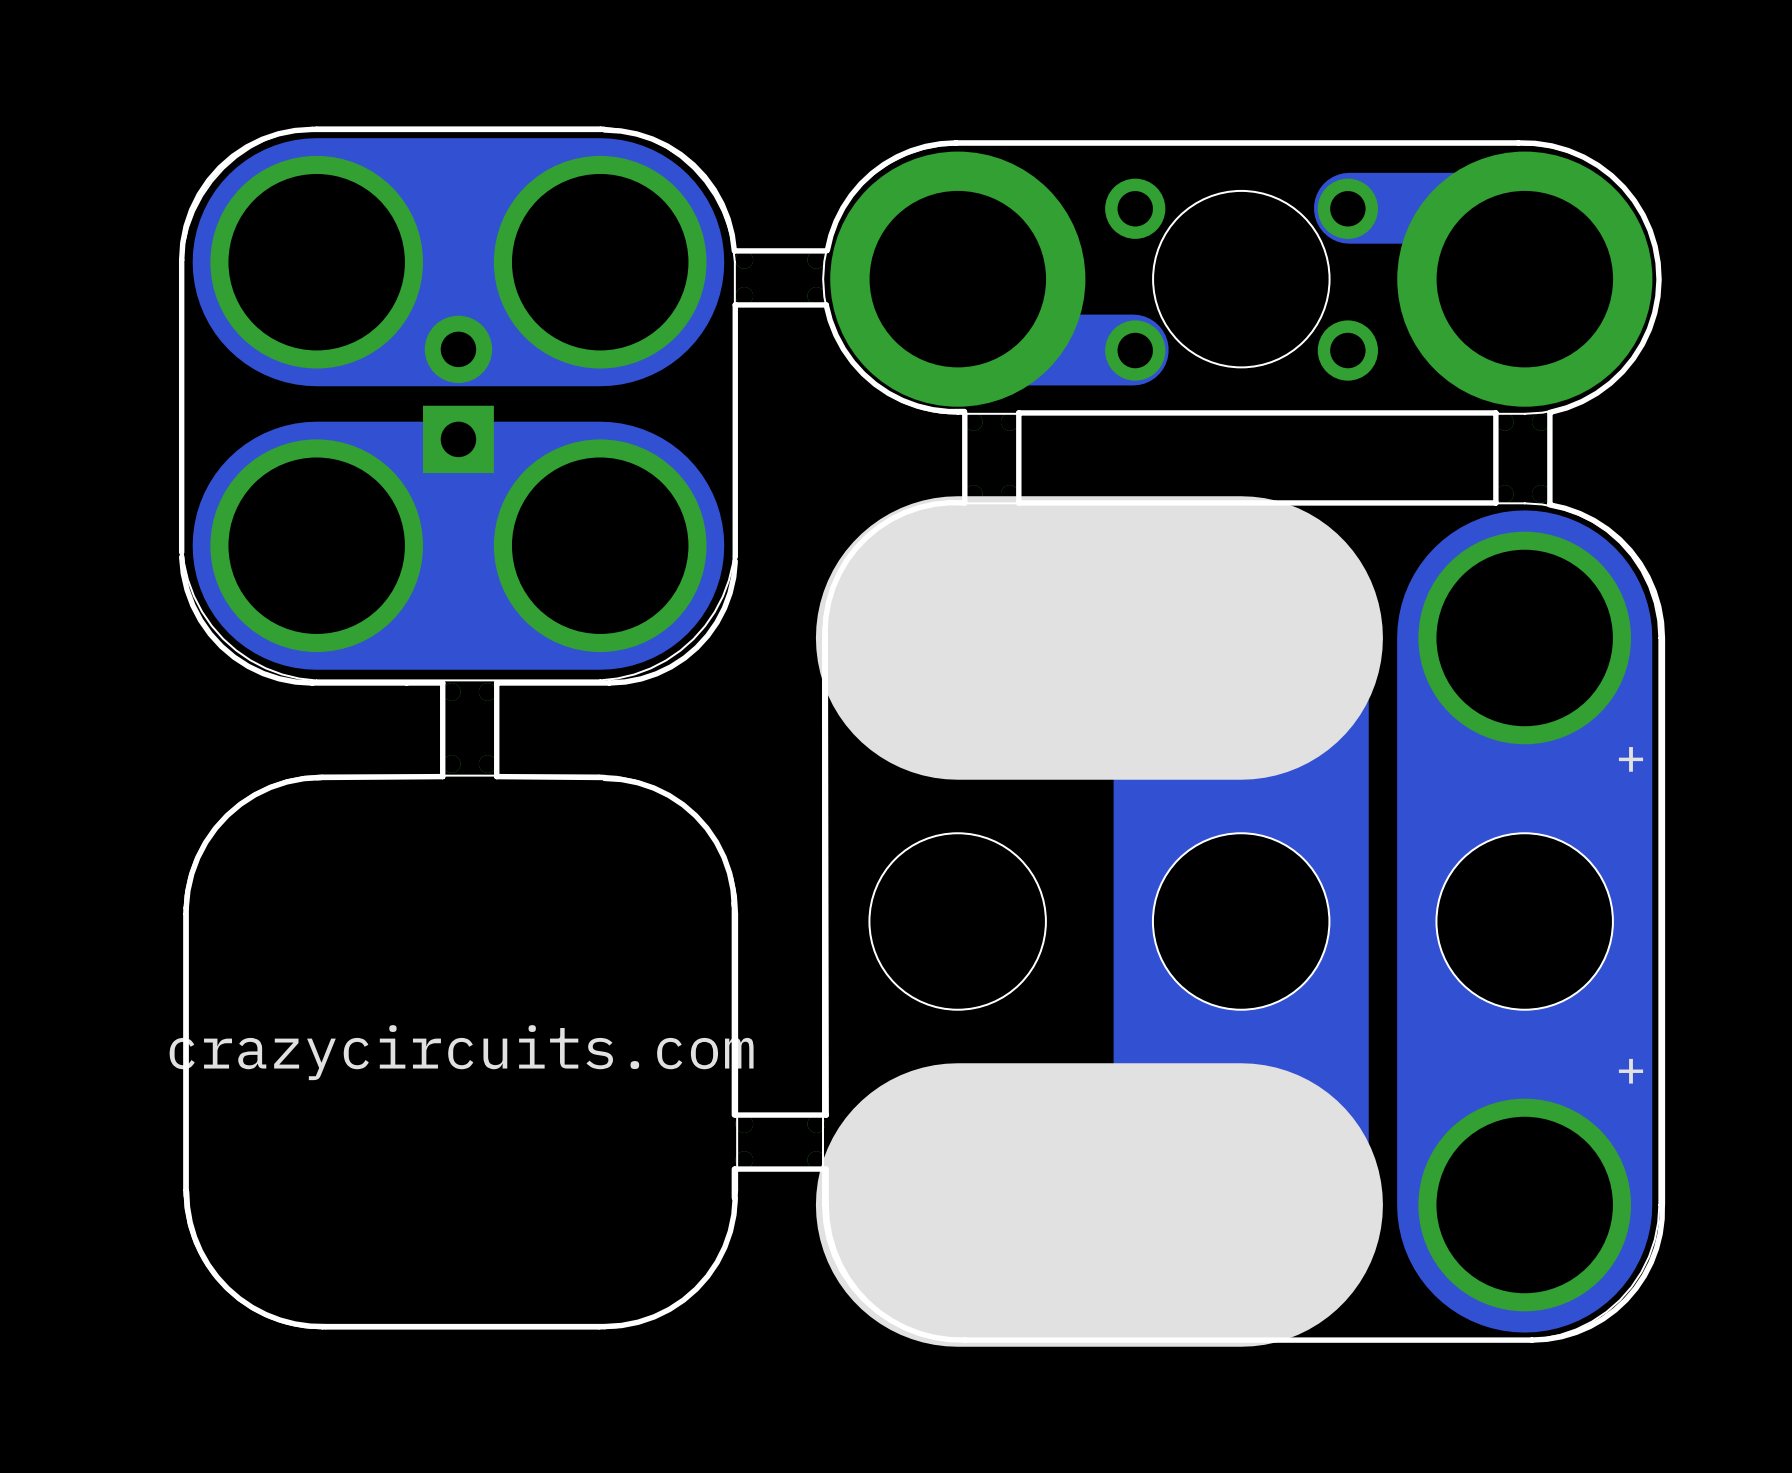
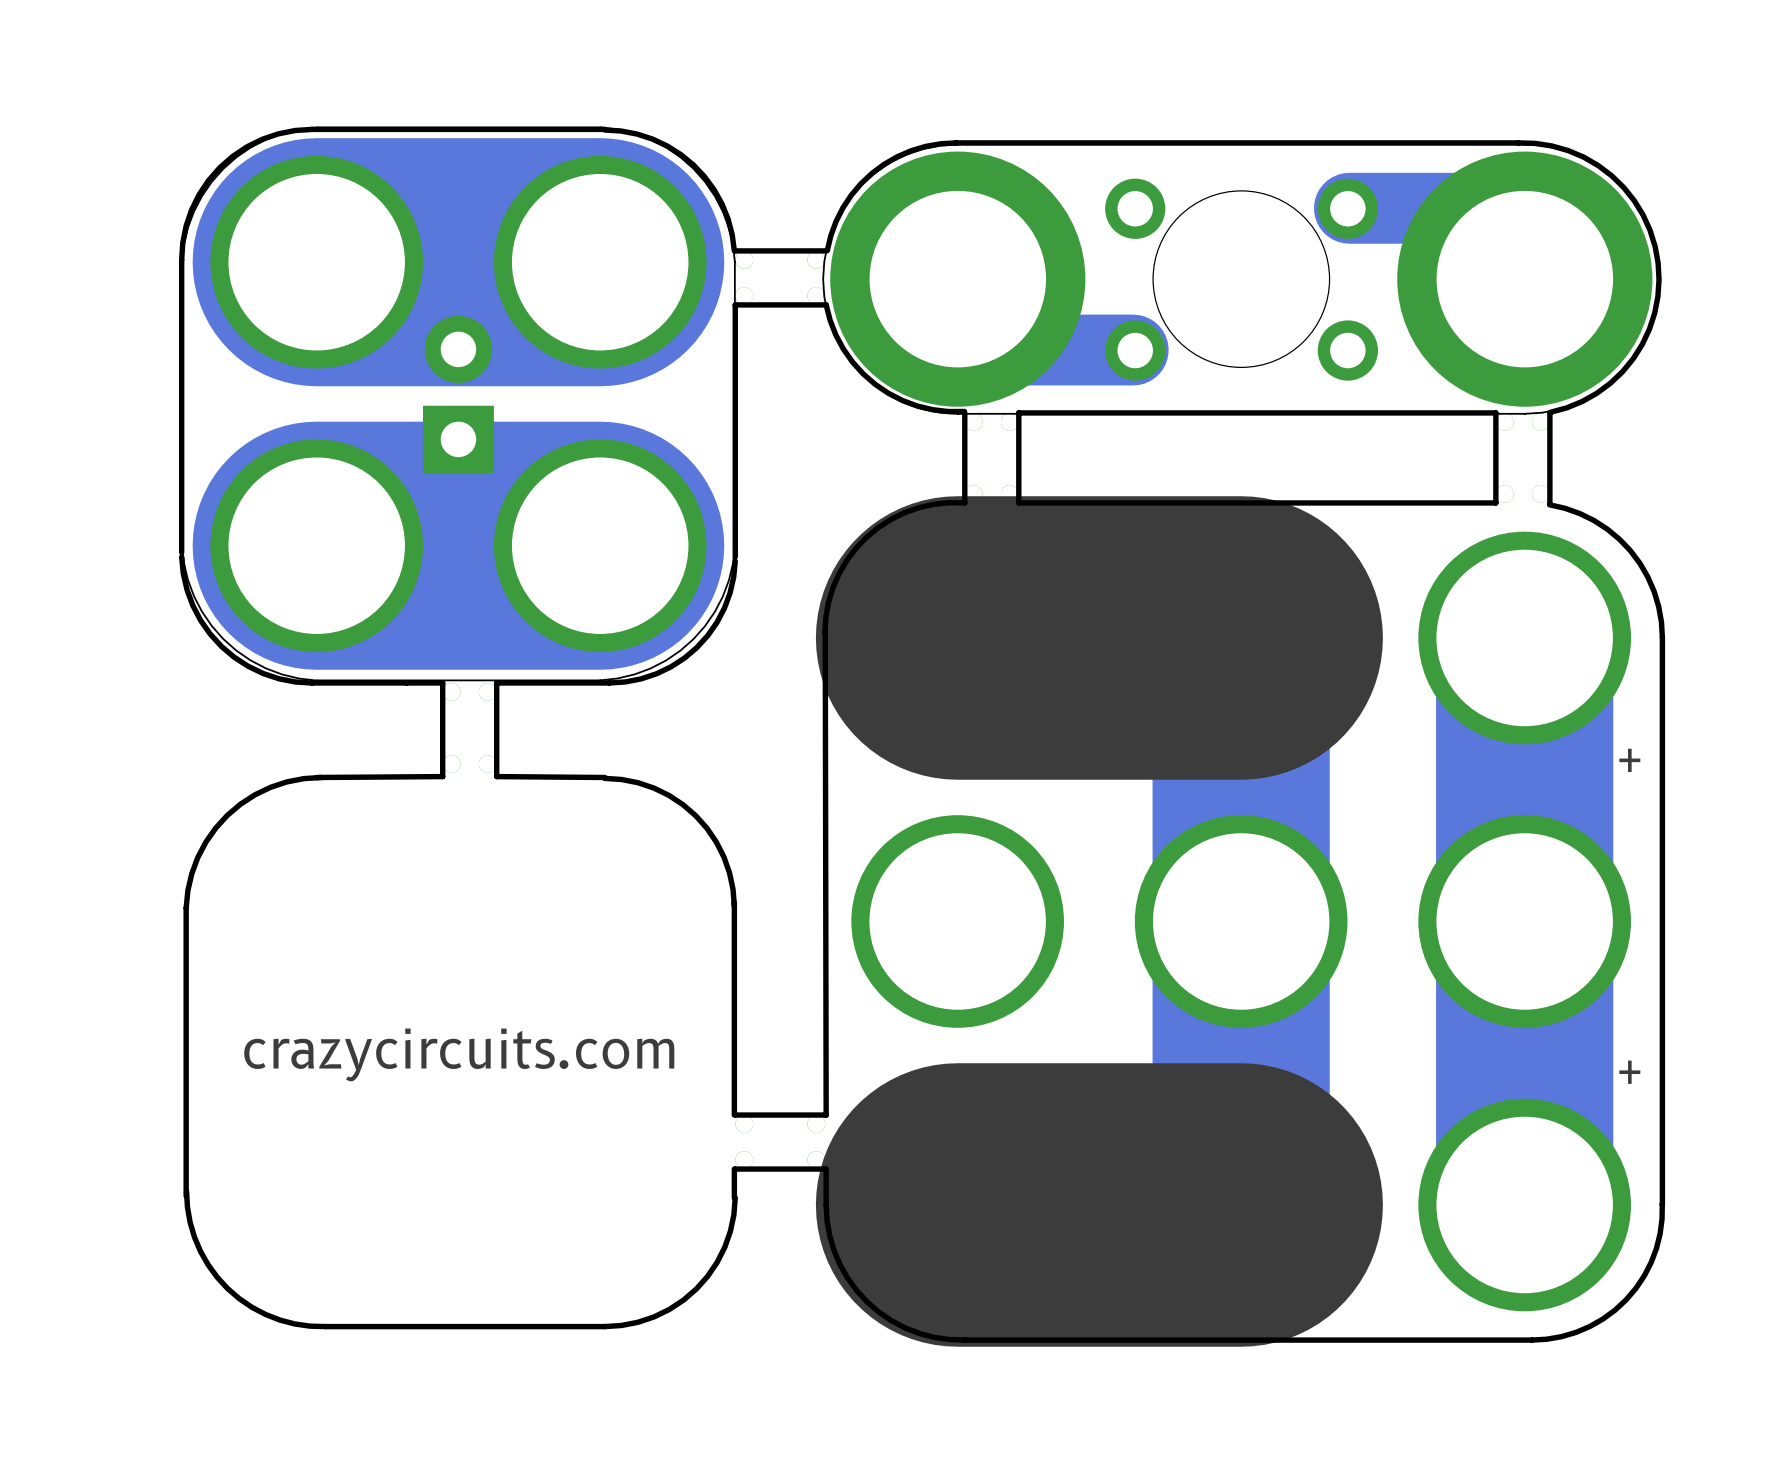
part footprint: [815, 496, 1661, 1347] -> [815, 496, 1631, 1347]
part footprint: [183, 774, 738, 1330] -> [244, 1028, 675, 1082]

